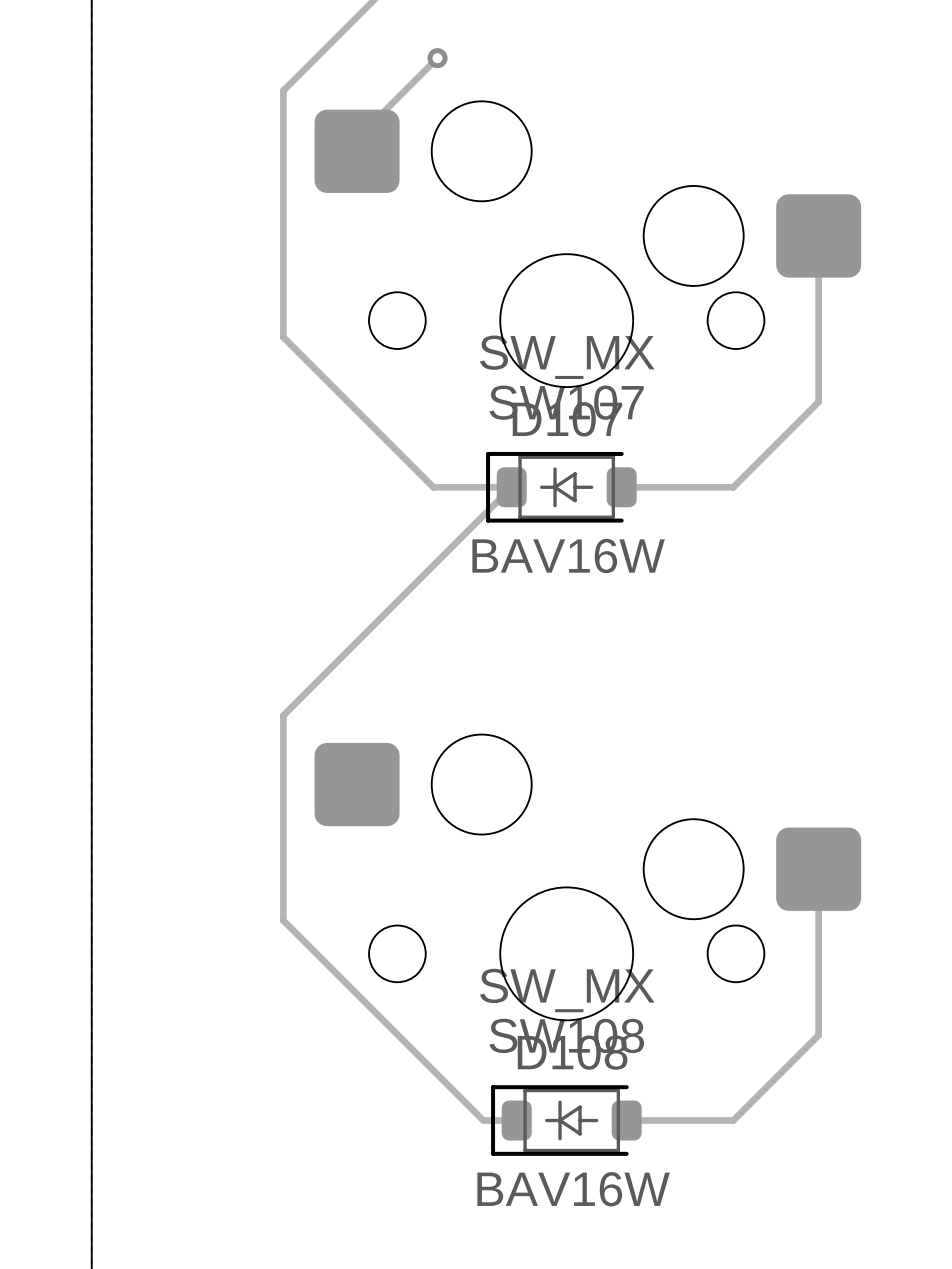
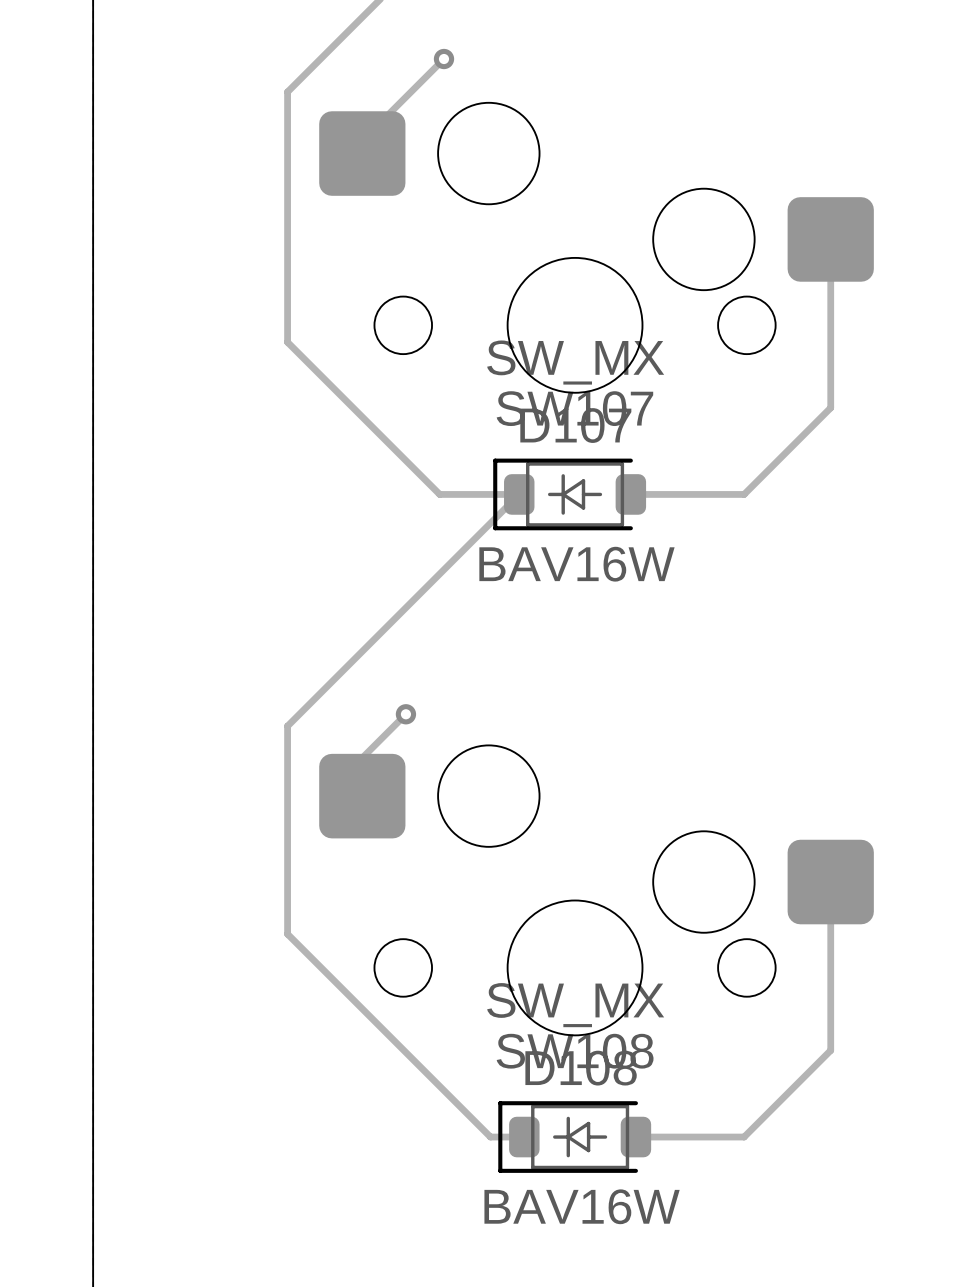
track: none -> (405, 714) (362, 757) (362, 796)
via: none -> (405, 714)

